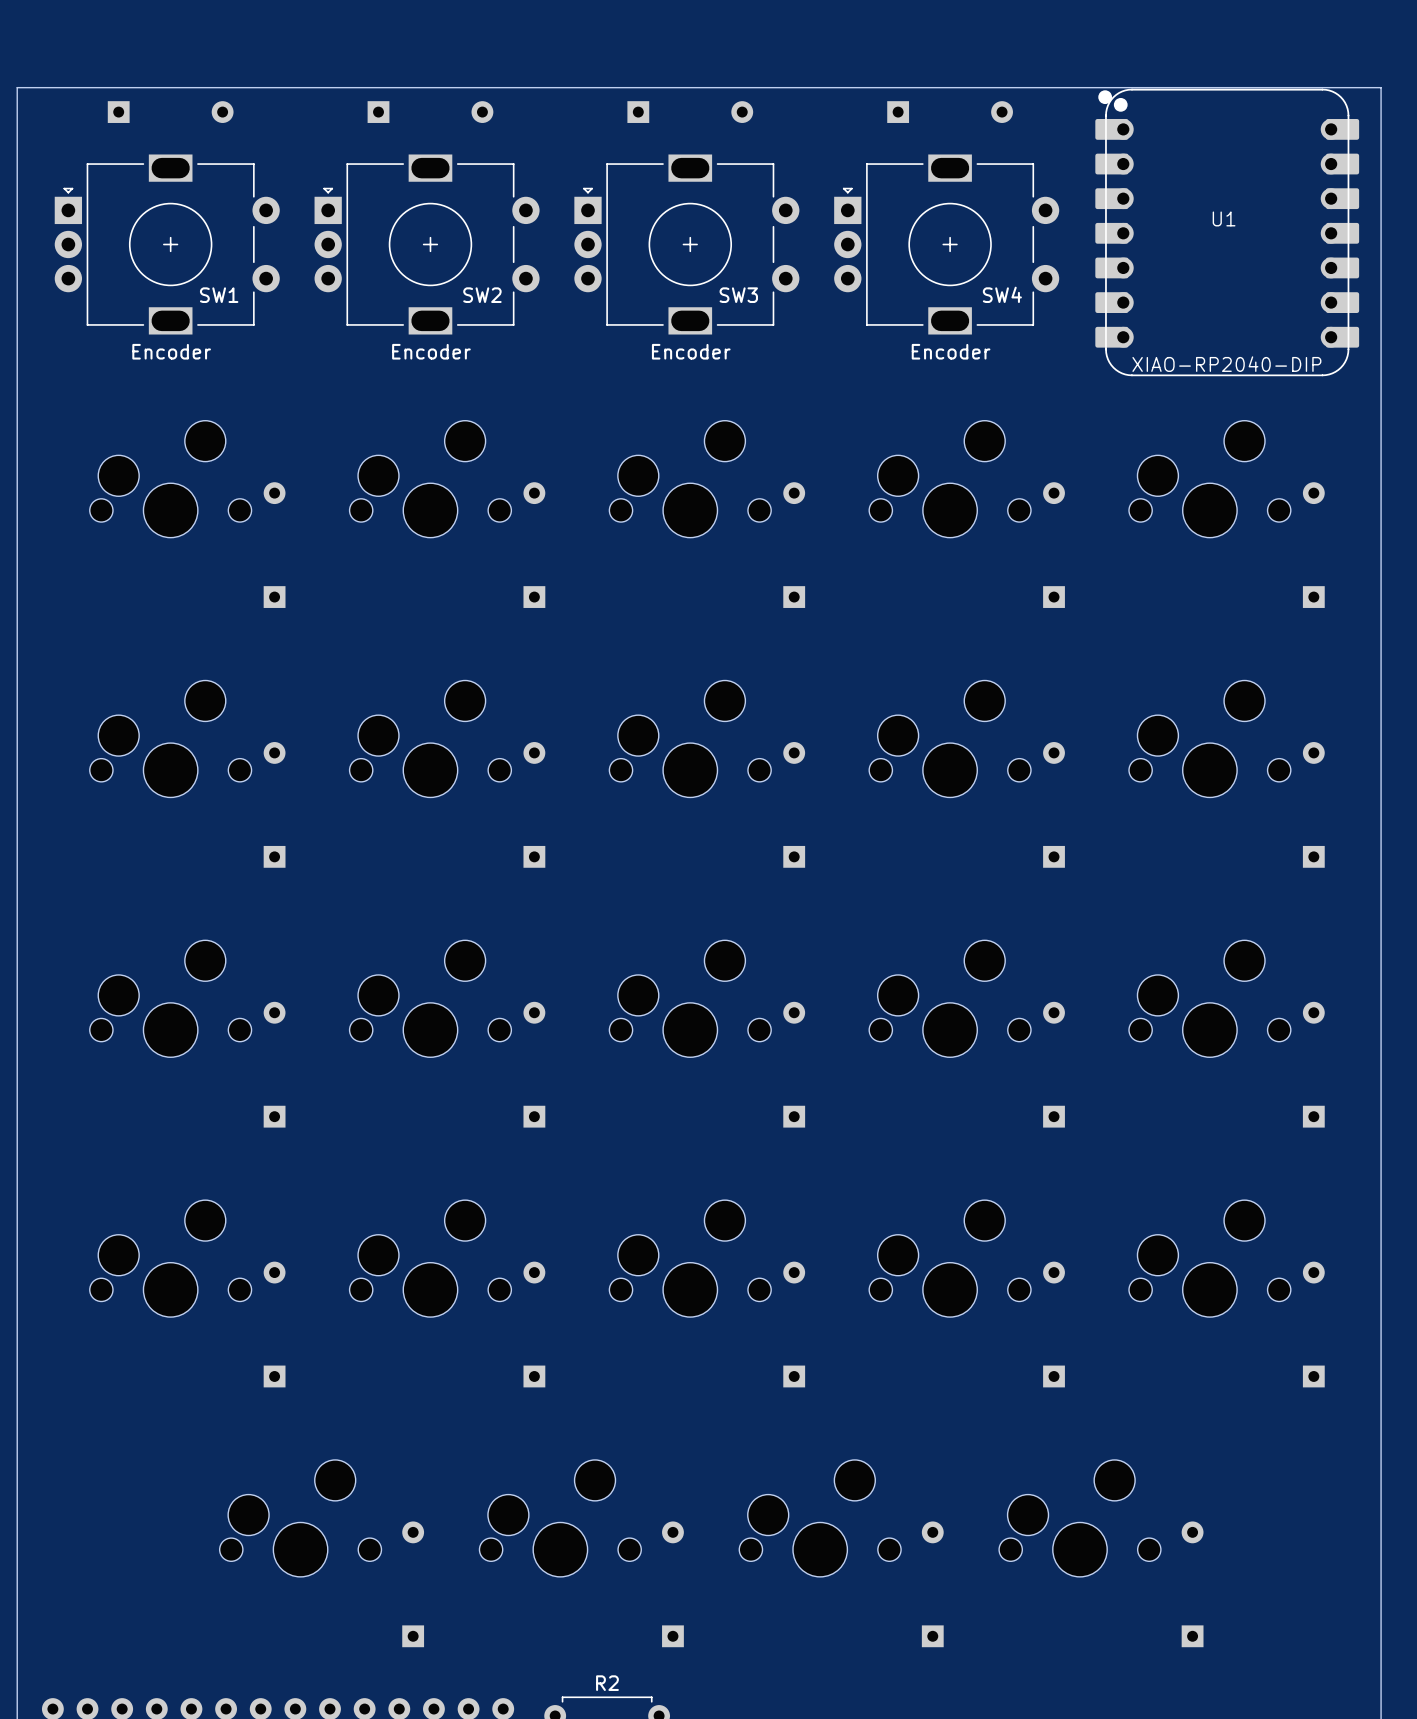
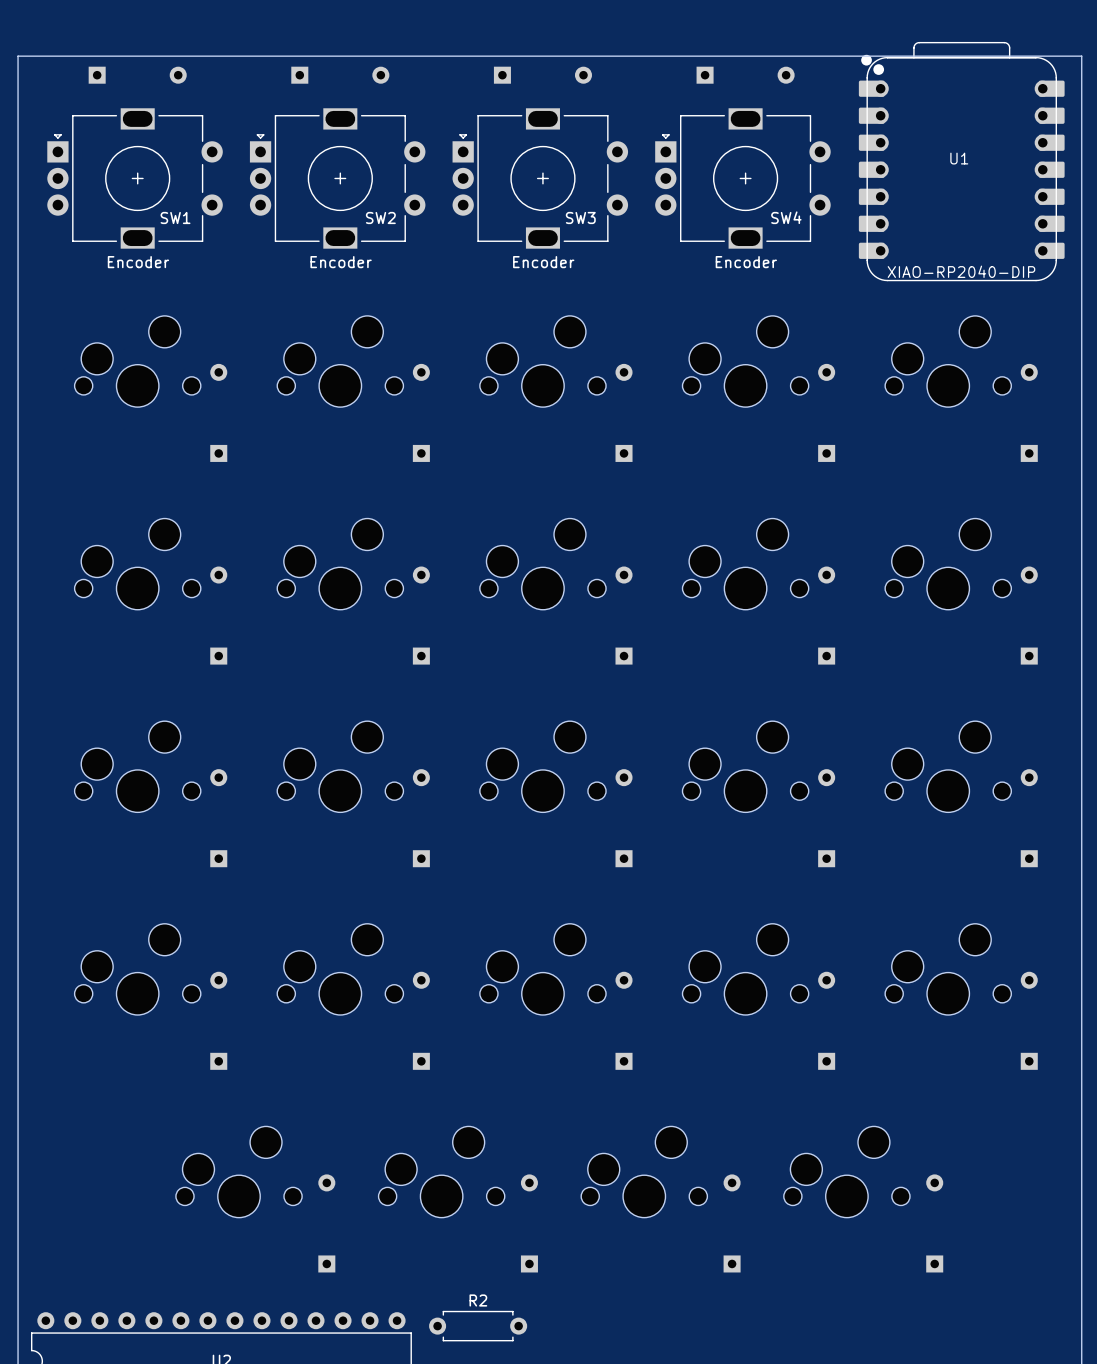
U1 footprint: [1095, 88, 1360, 377] -> [858, 41, 1065, 282]

